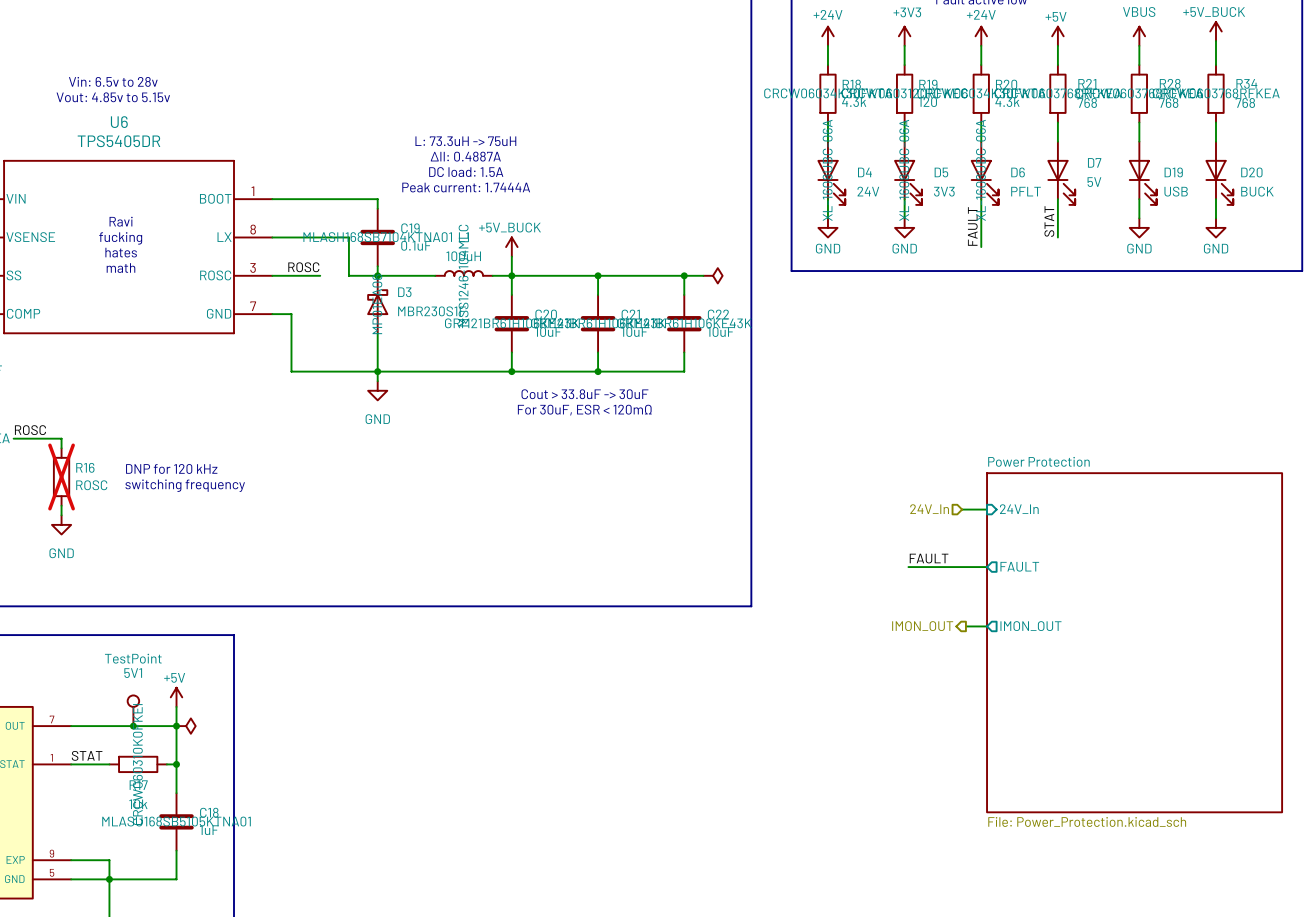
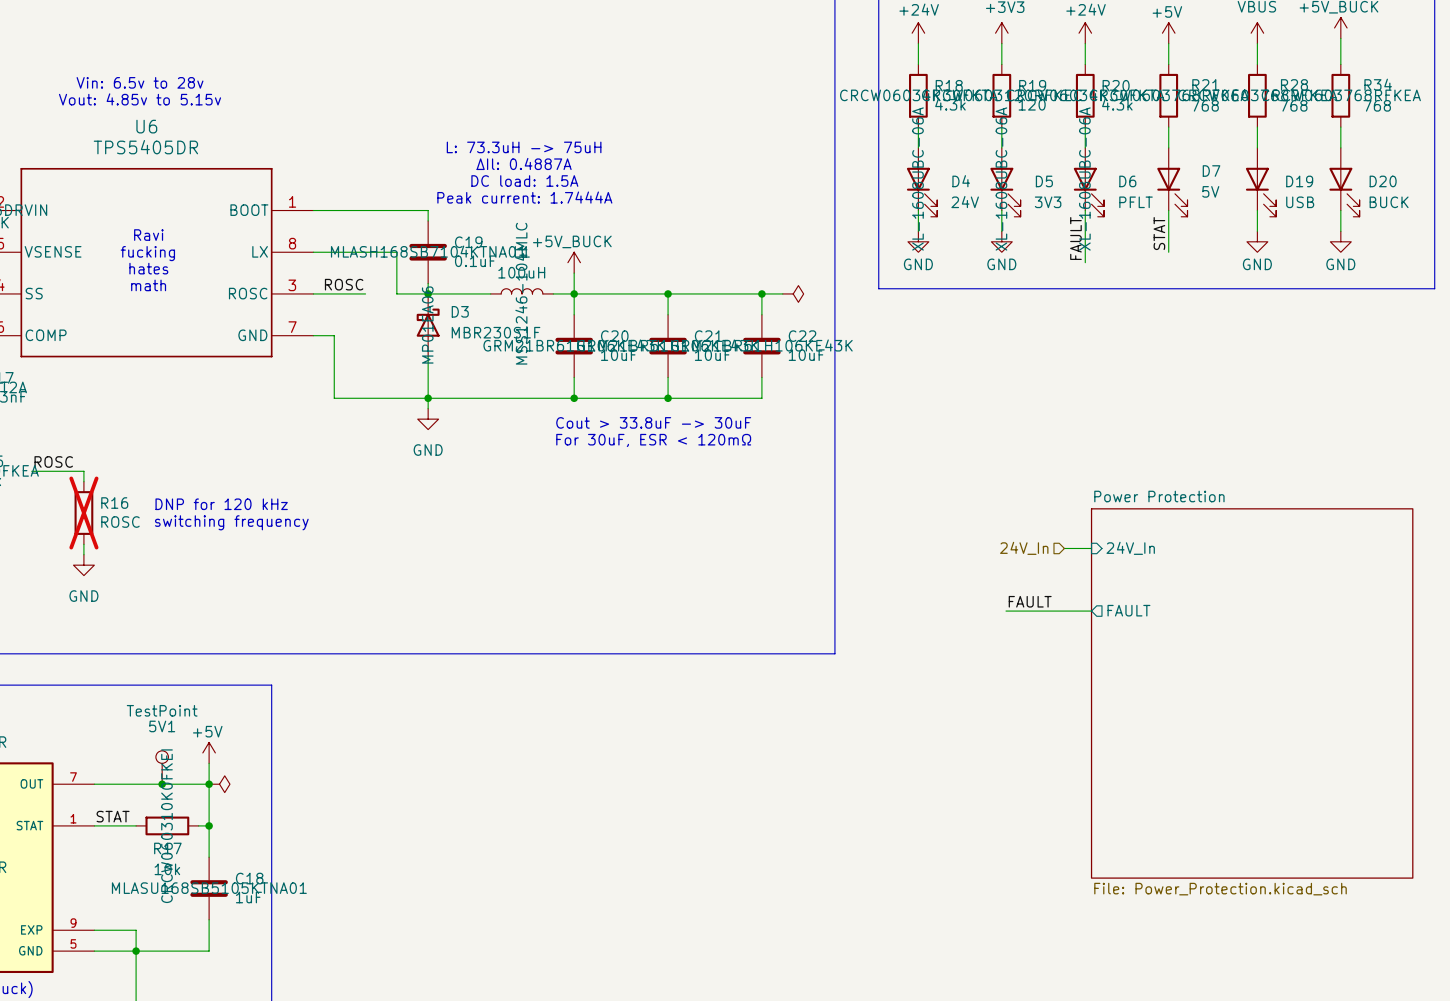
hierarchical label: IMON_OUT (922, 626) -> none
wire: (965, 626) (987, 626) -> none
sheet pin: IMON_OUT (1030, 626) -> none

